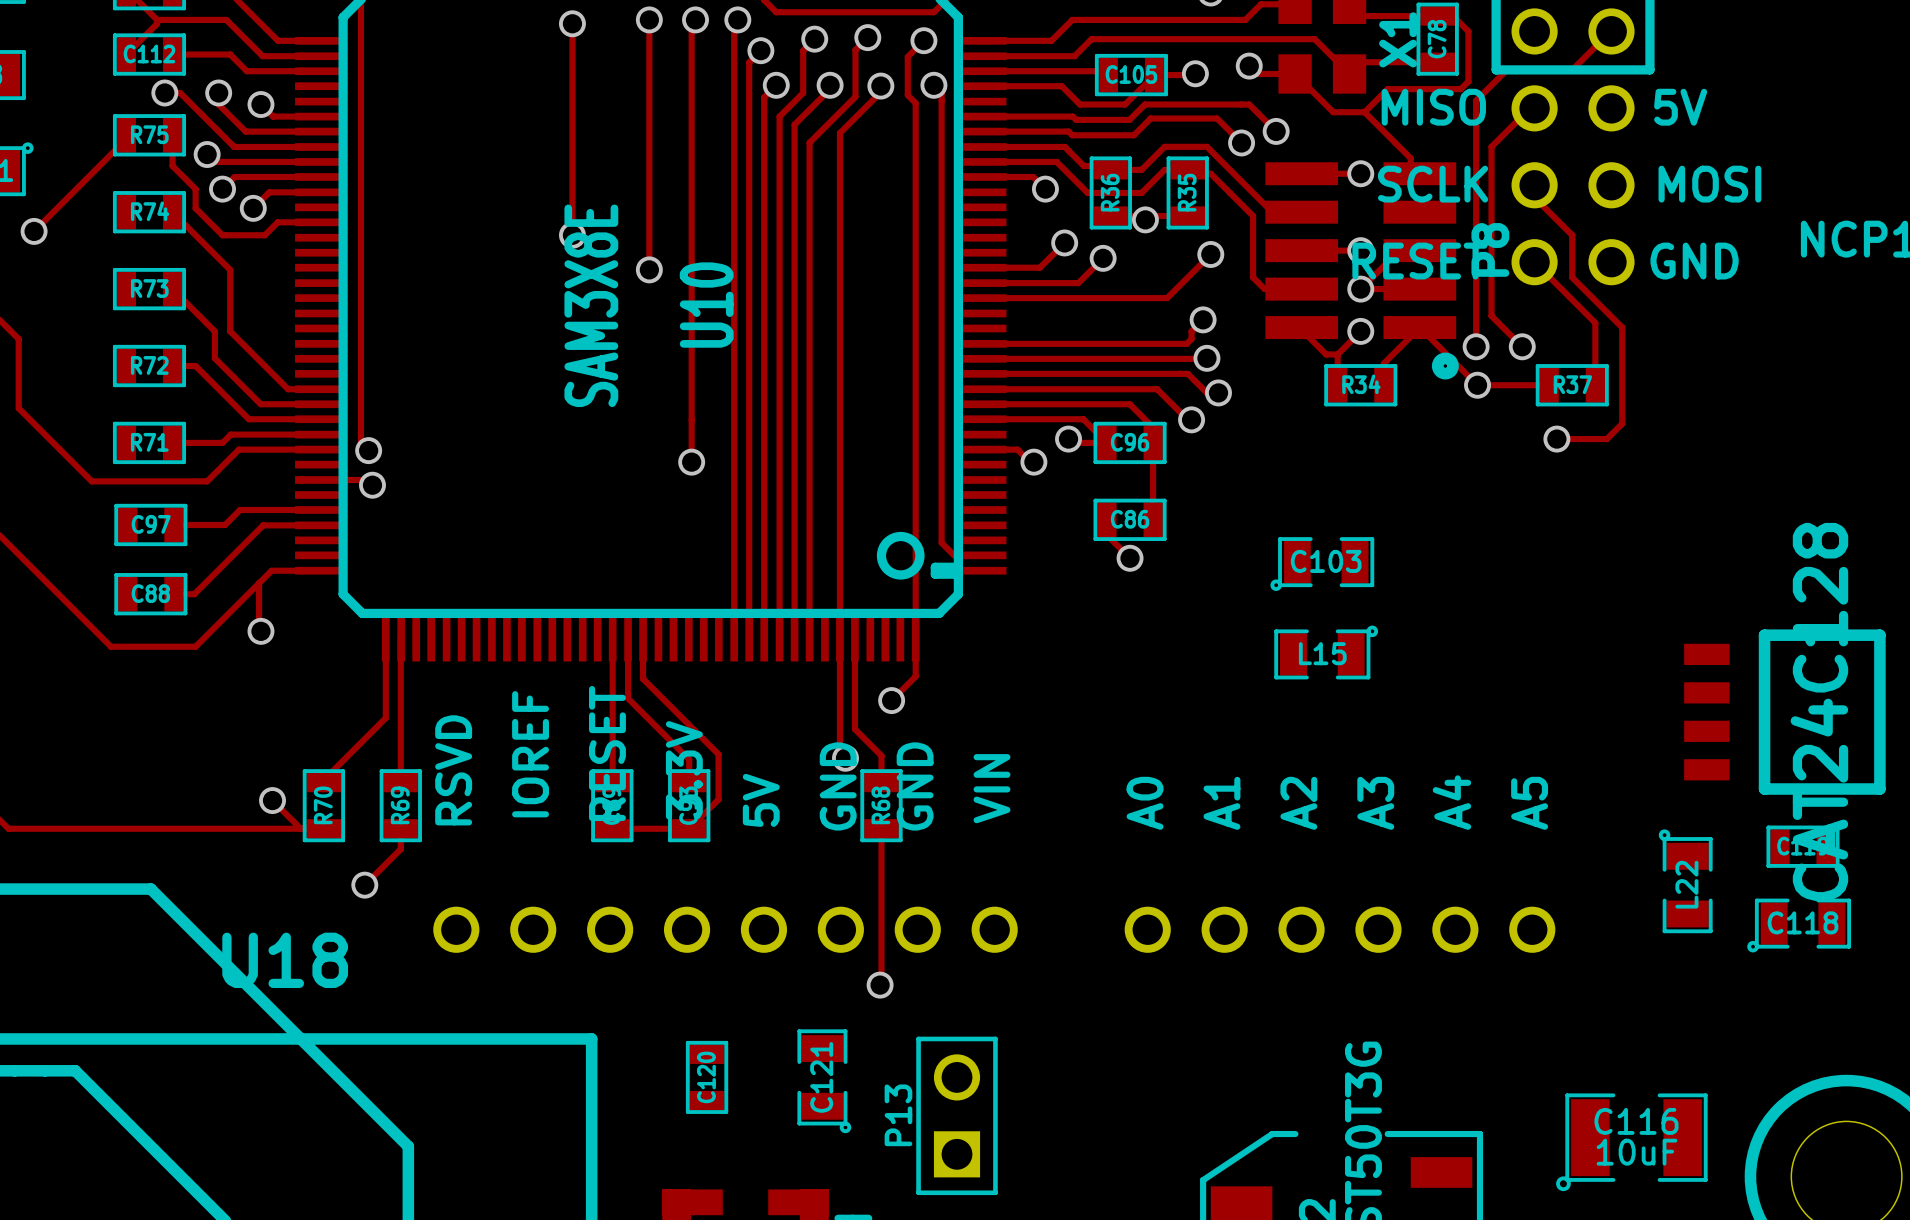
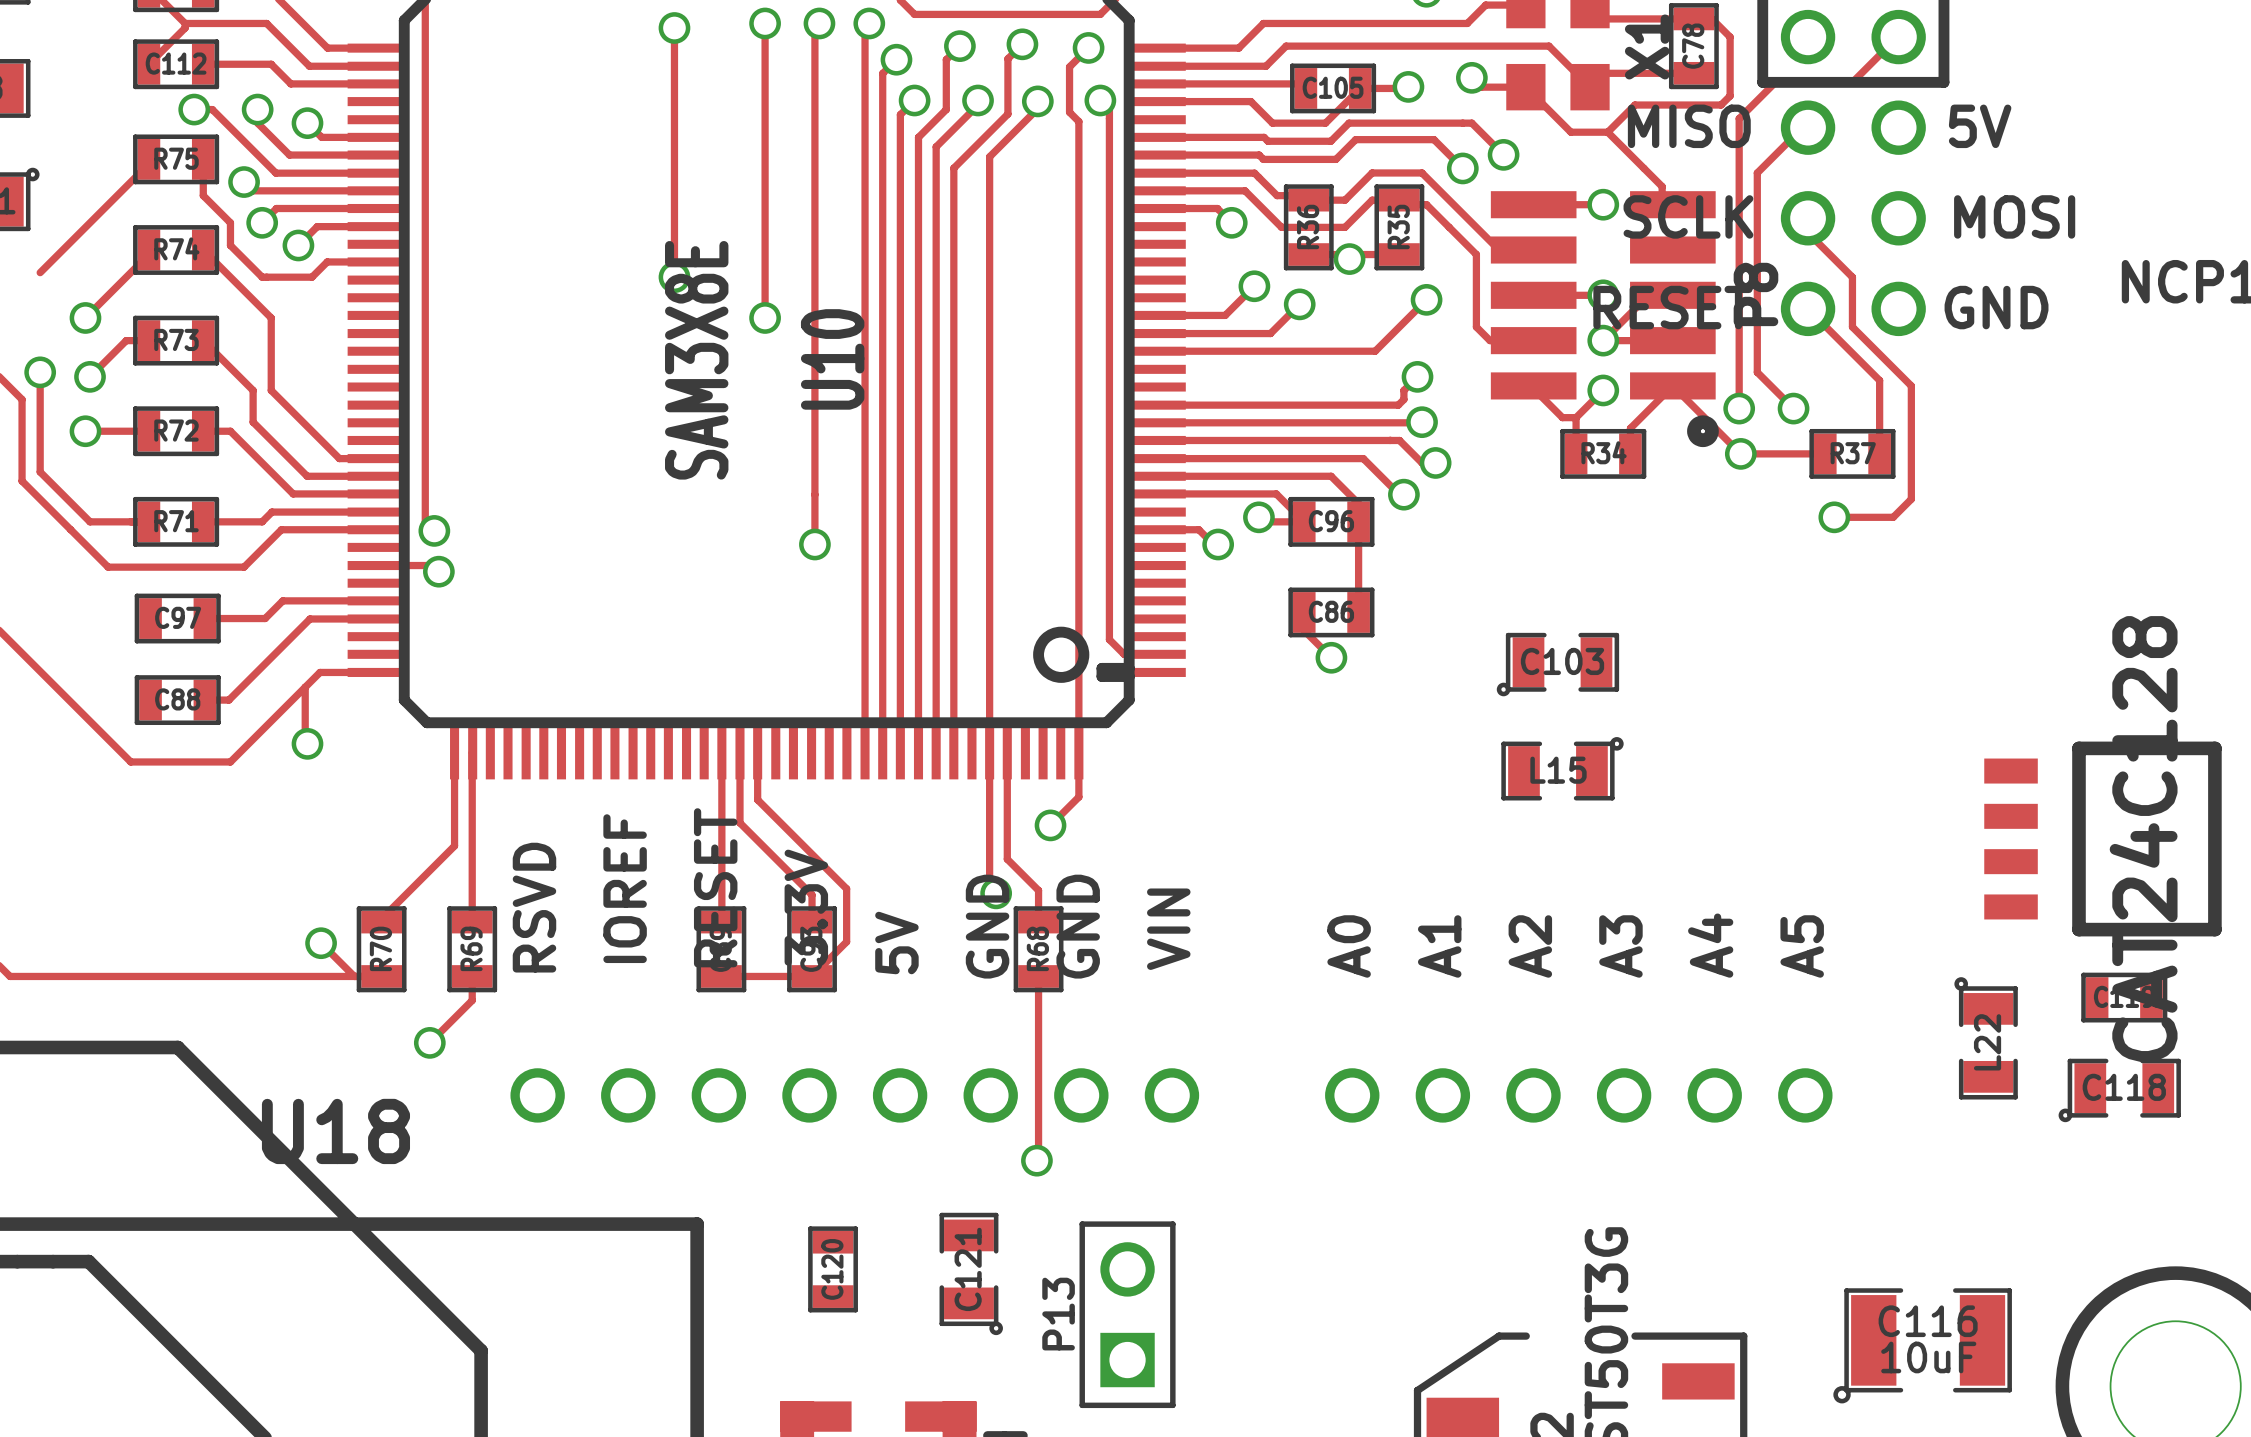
track: none -> (148, 250) (148, 254) (85, 317)
via: (34, 231) -> none
via: none -> (85, 317)
track: none -> (148, 340) (126, 340) (90, 376)
track: none -> (40, 372) (40, 472) (90, 521) (148, 521)
via: none -> (40, 372)
via: none -> (90, 376)
track: none -> (85, 431) (148, 431)
via: none -> (85, 431)

